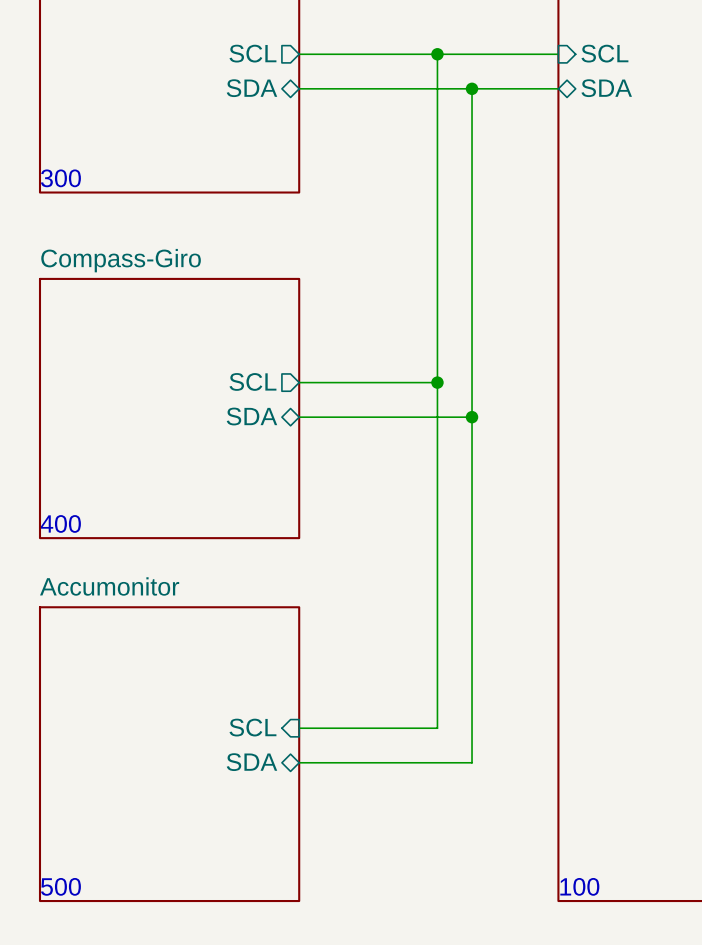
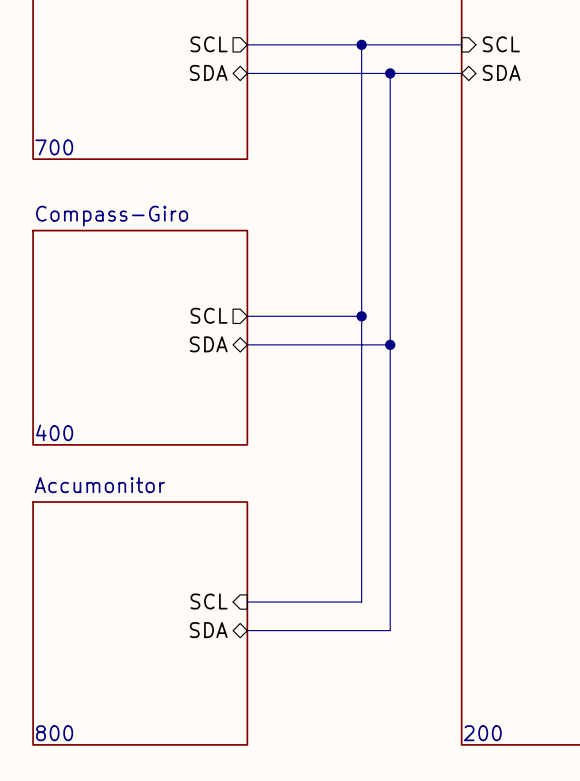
text: 300 (60, 178) -> 700 (54, 147)
text: 500 (60, 886) -> 800 (54, 733)
text: 100 (579, 886) -> 200 (482, 733)

